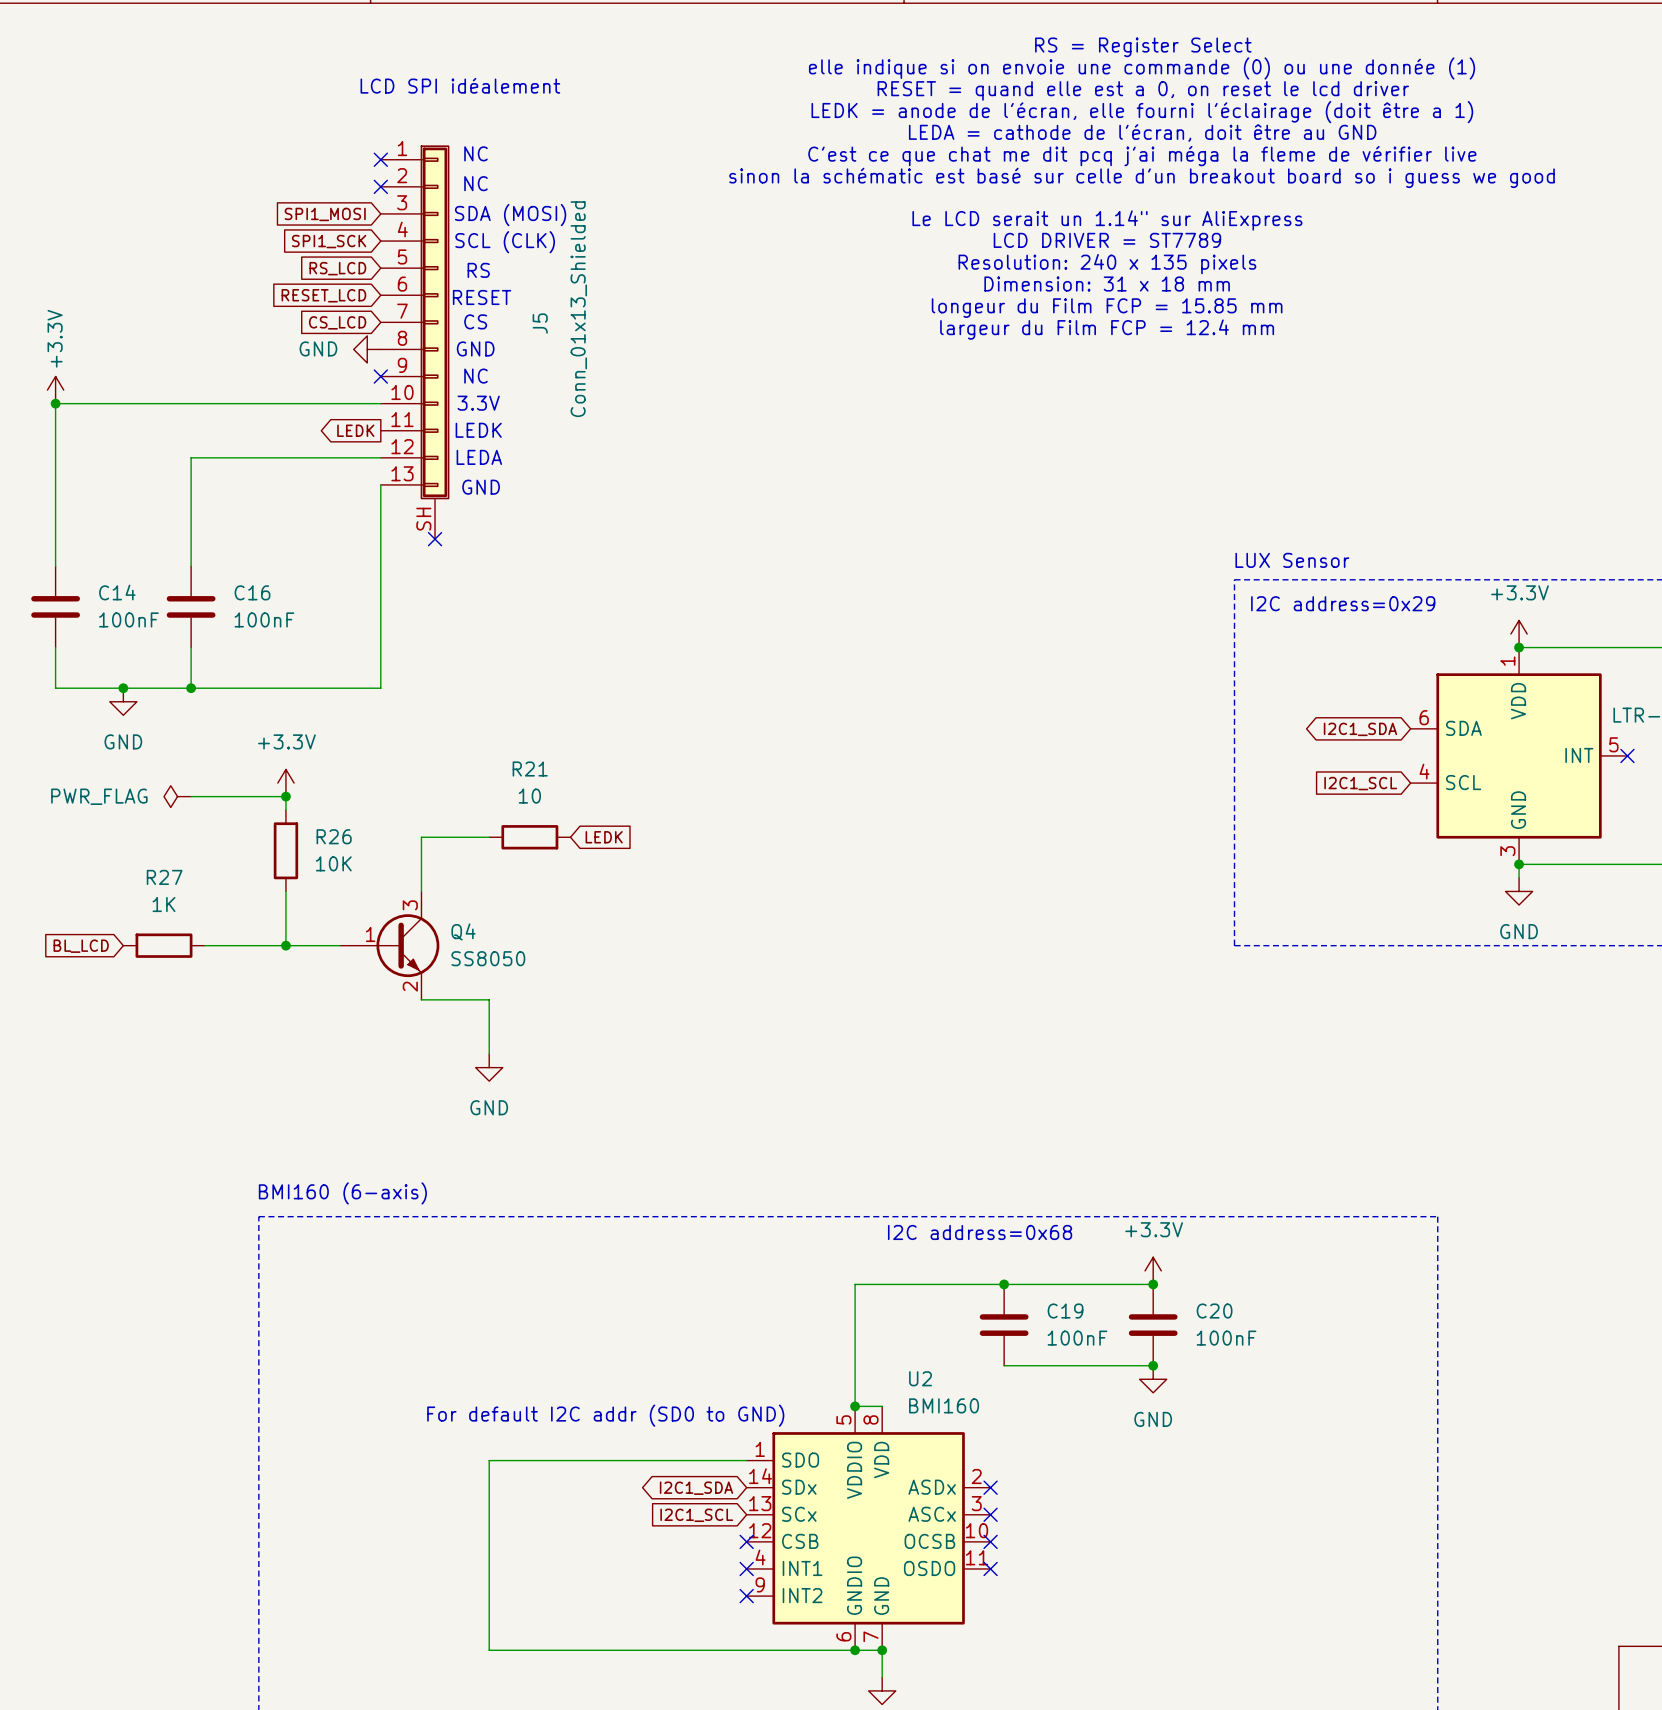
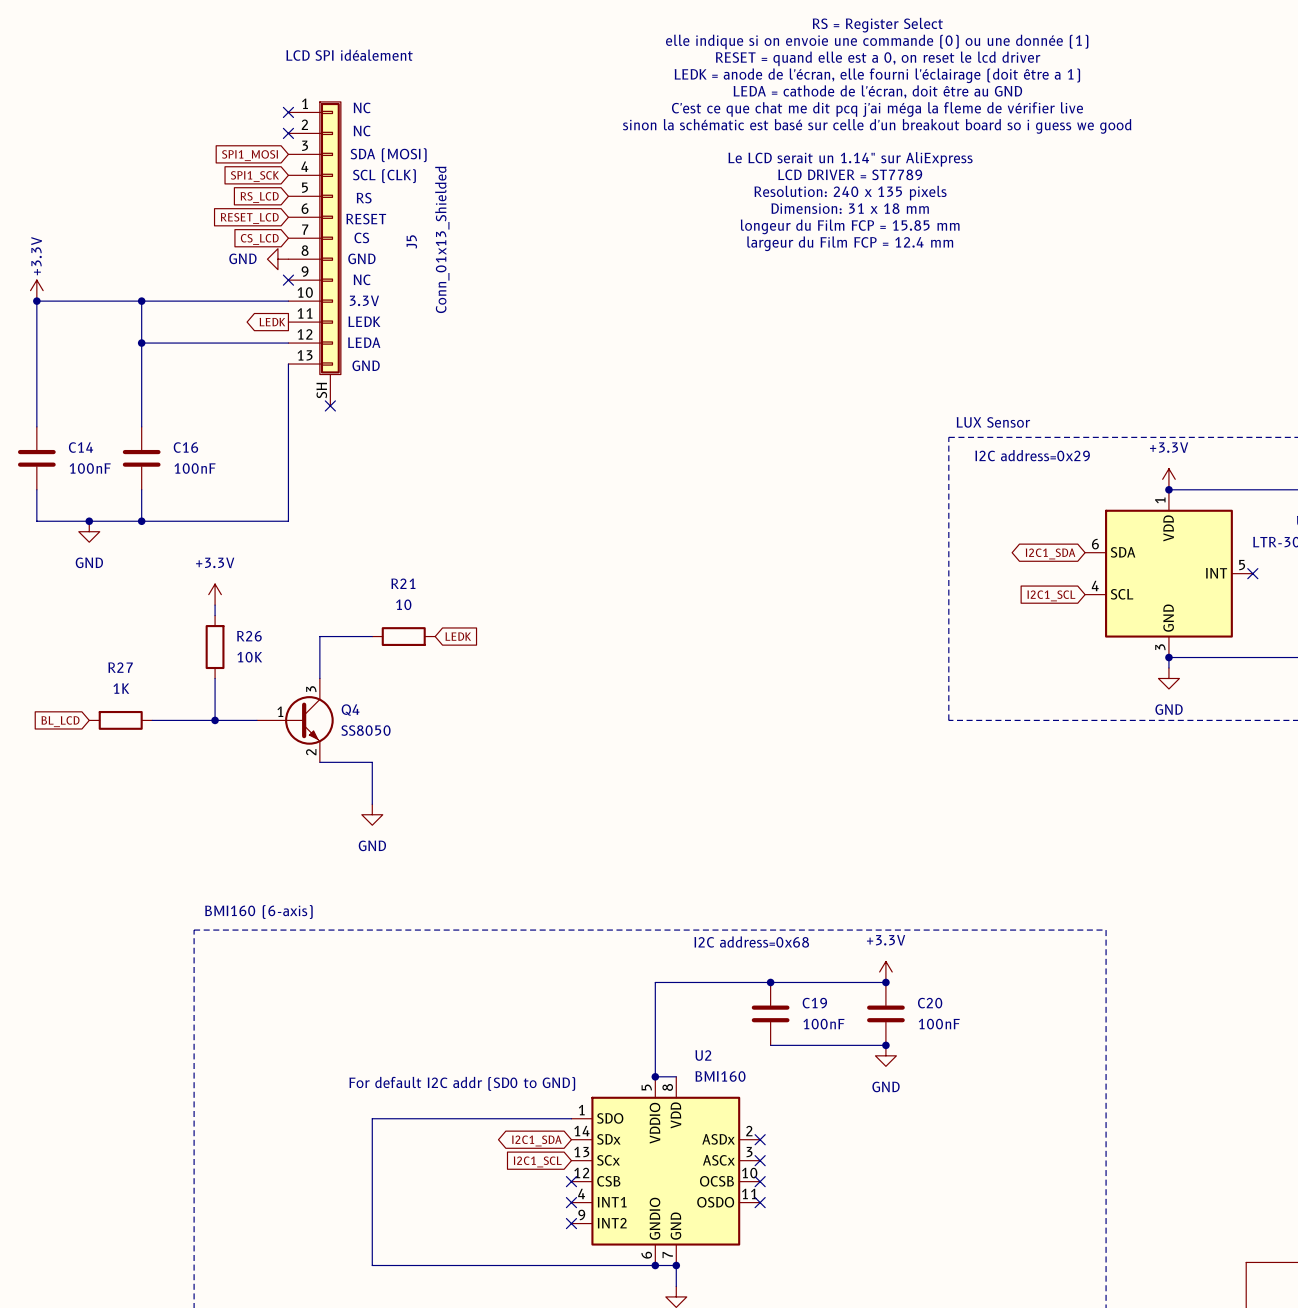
wire: none -> (141, 301) (141, 343)
junction: none -> (141, 301)
junction: none -> (141, 343)
power symbol: PWR_FLAG (177, 796) -> none
wire: (191, 796) (285, 796) -> none
junction: (285, 796) -> none

